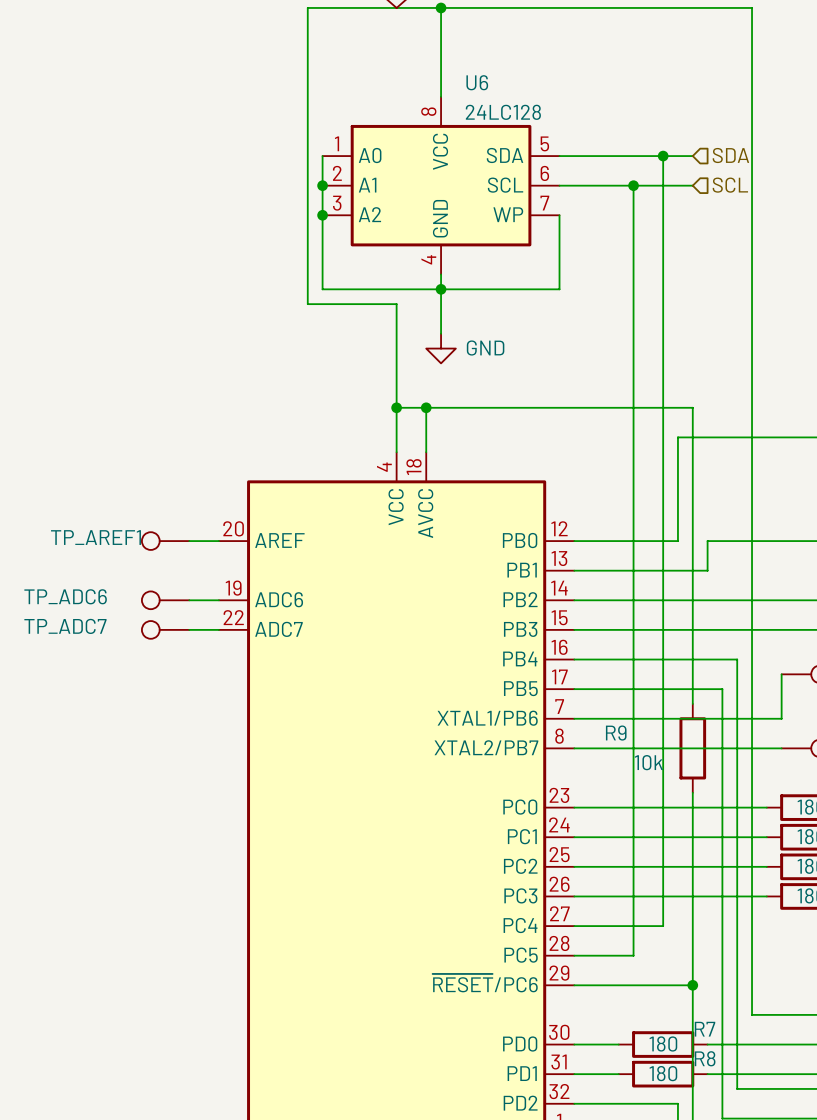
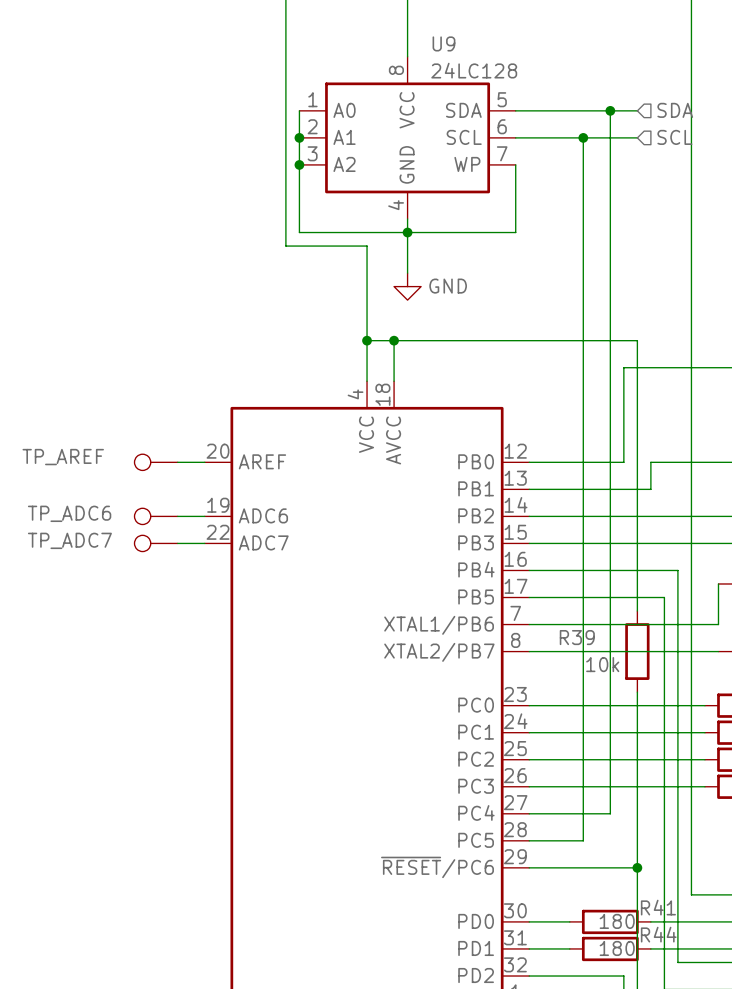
U6 name: U6 (477, 82) -> U9 (443, 43)
TP_AREF1 name: TP_AREF1 (95, 537) -> TP_AREF (63, 457)
R9 name: R9 (616, 733) -> R39 (577, 637)
R7 name: R7 (705, 1029) -> R41 (658, 907)
R8 name: R8 (705, 1058) -> R44 (658, 934)

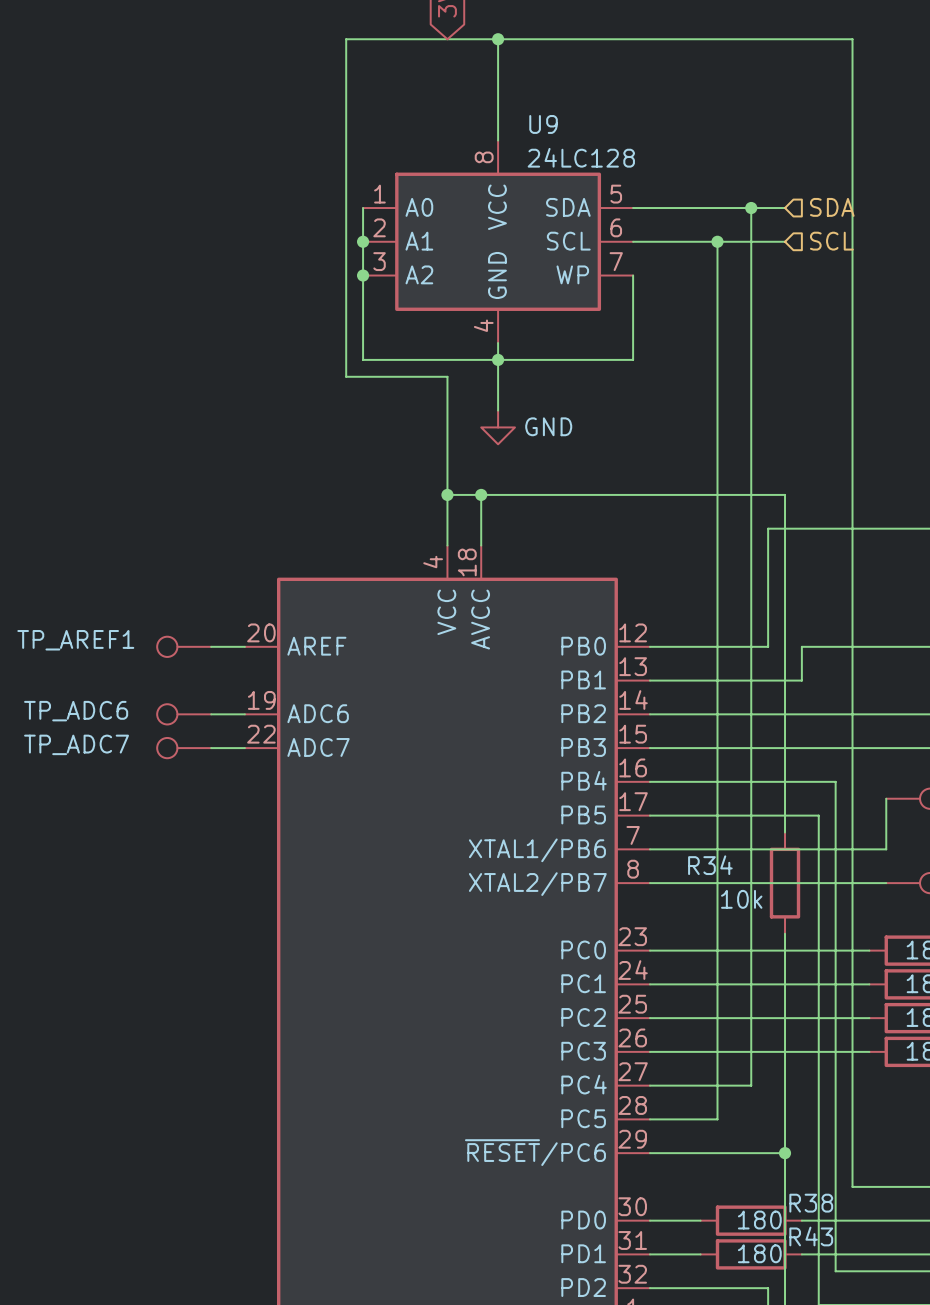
TP_AREF name: TP_AREF (63, 457) -> TP_AREF1 (75, 640)
R39 name: R39 (577, 637) -> R34 (710, 865)
R41 name: R41 (658, 907) -> R38 (811, 1203)
R44 name: R44 (658, 934) -> R43 (811, 1236)

